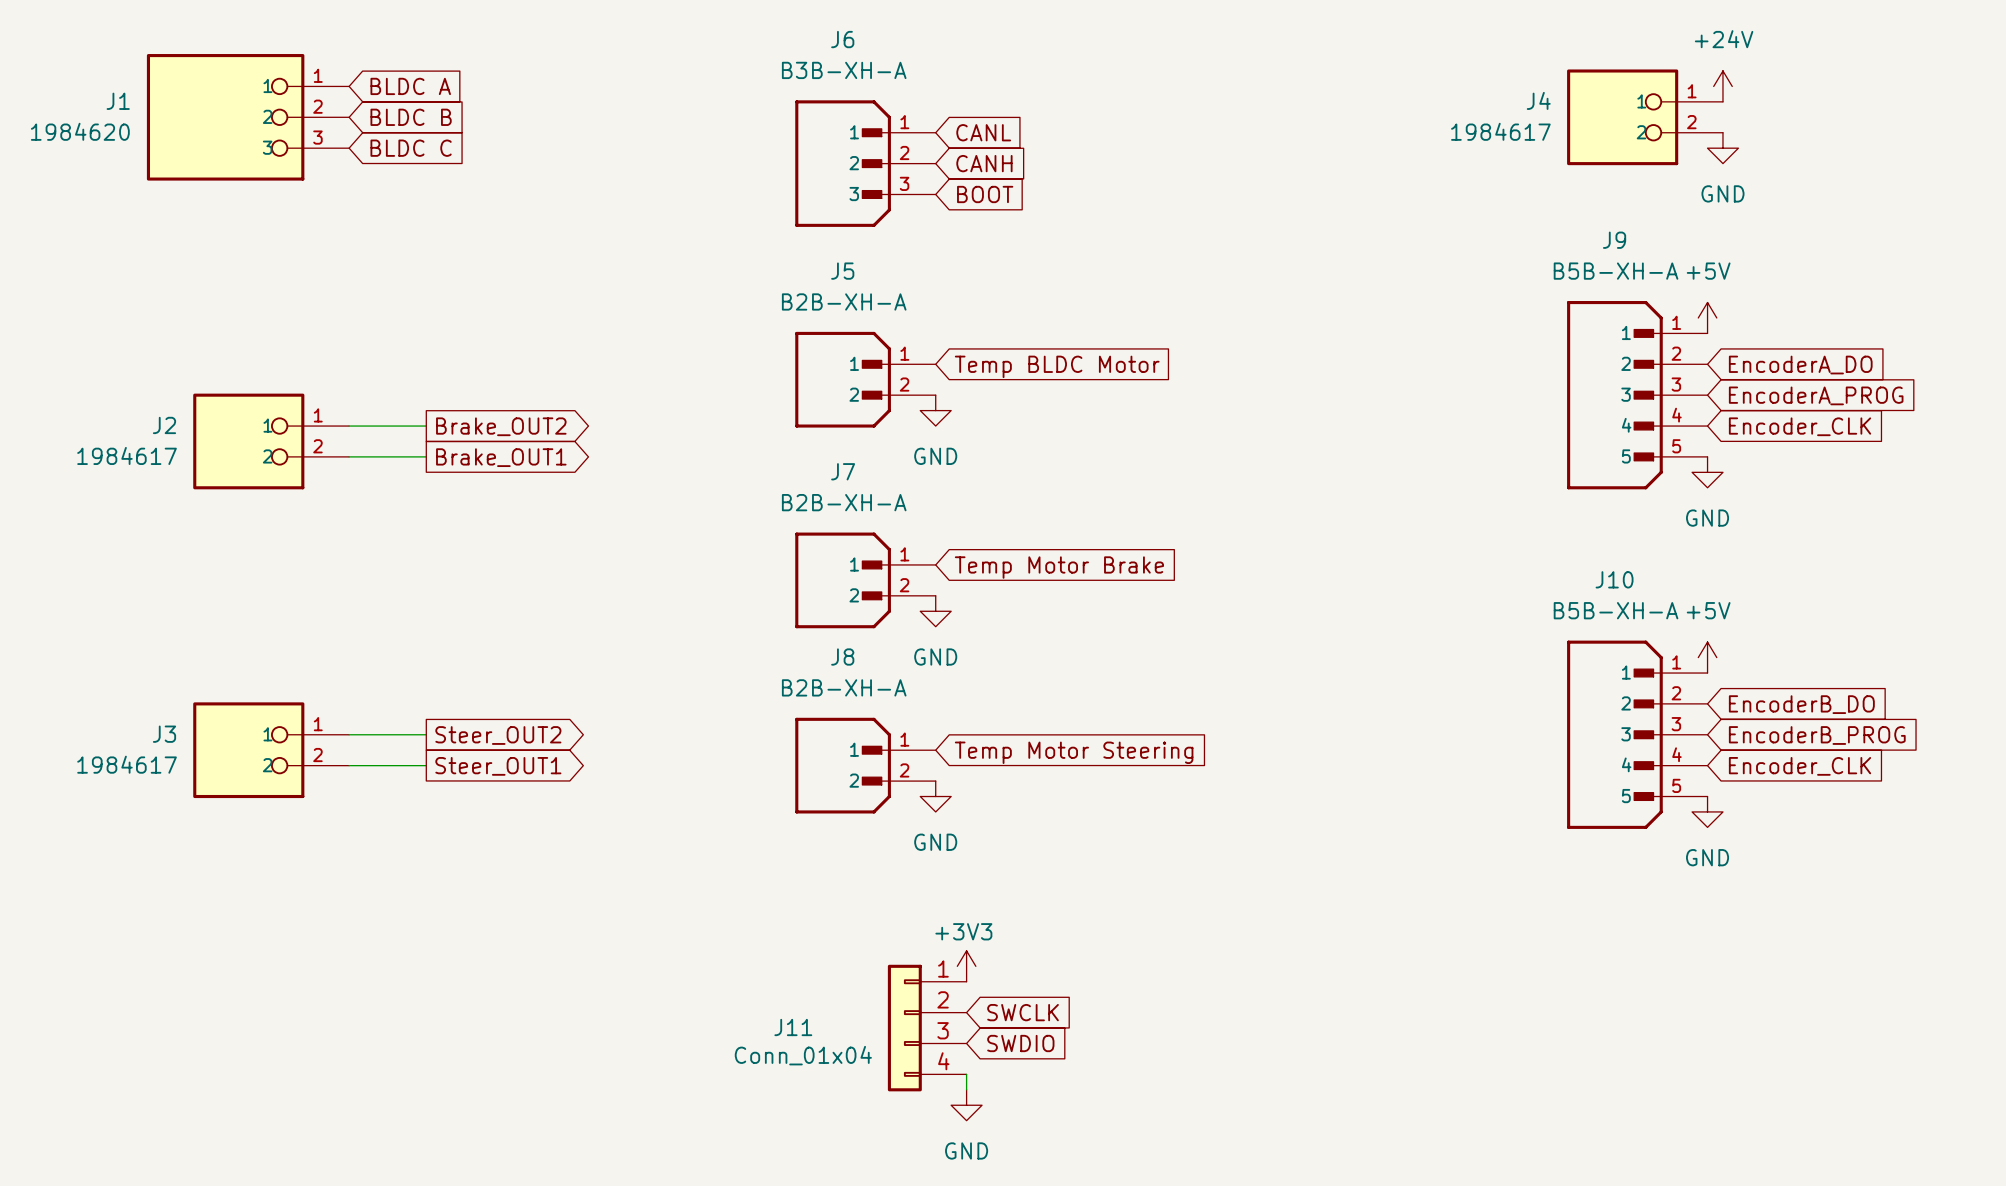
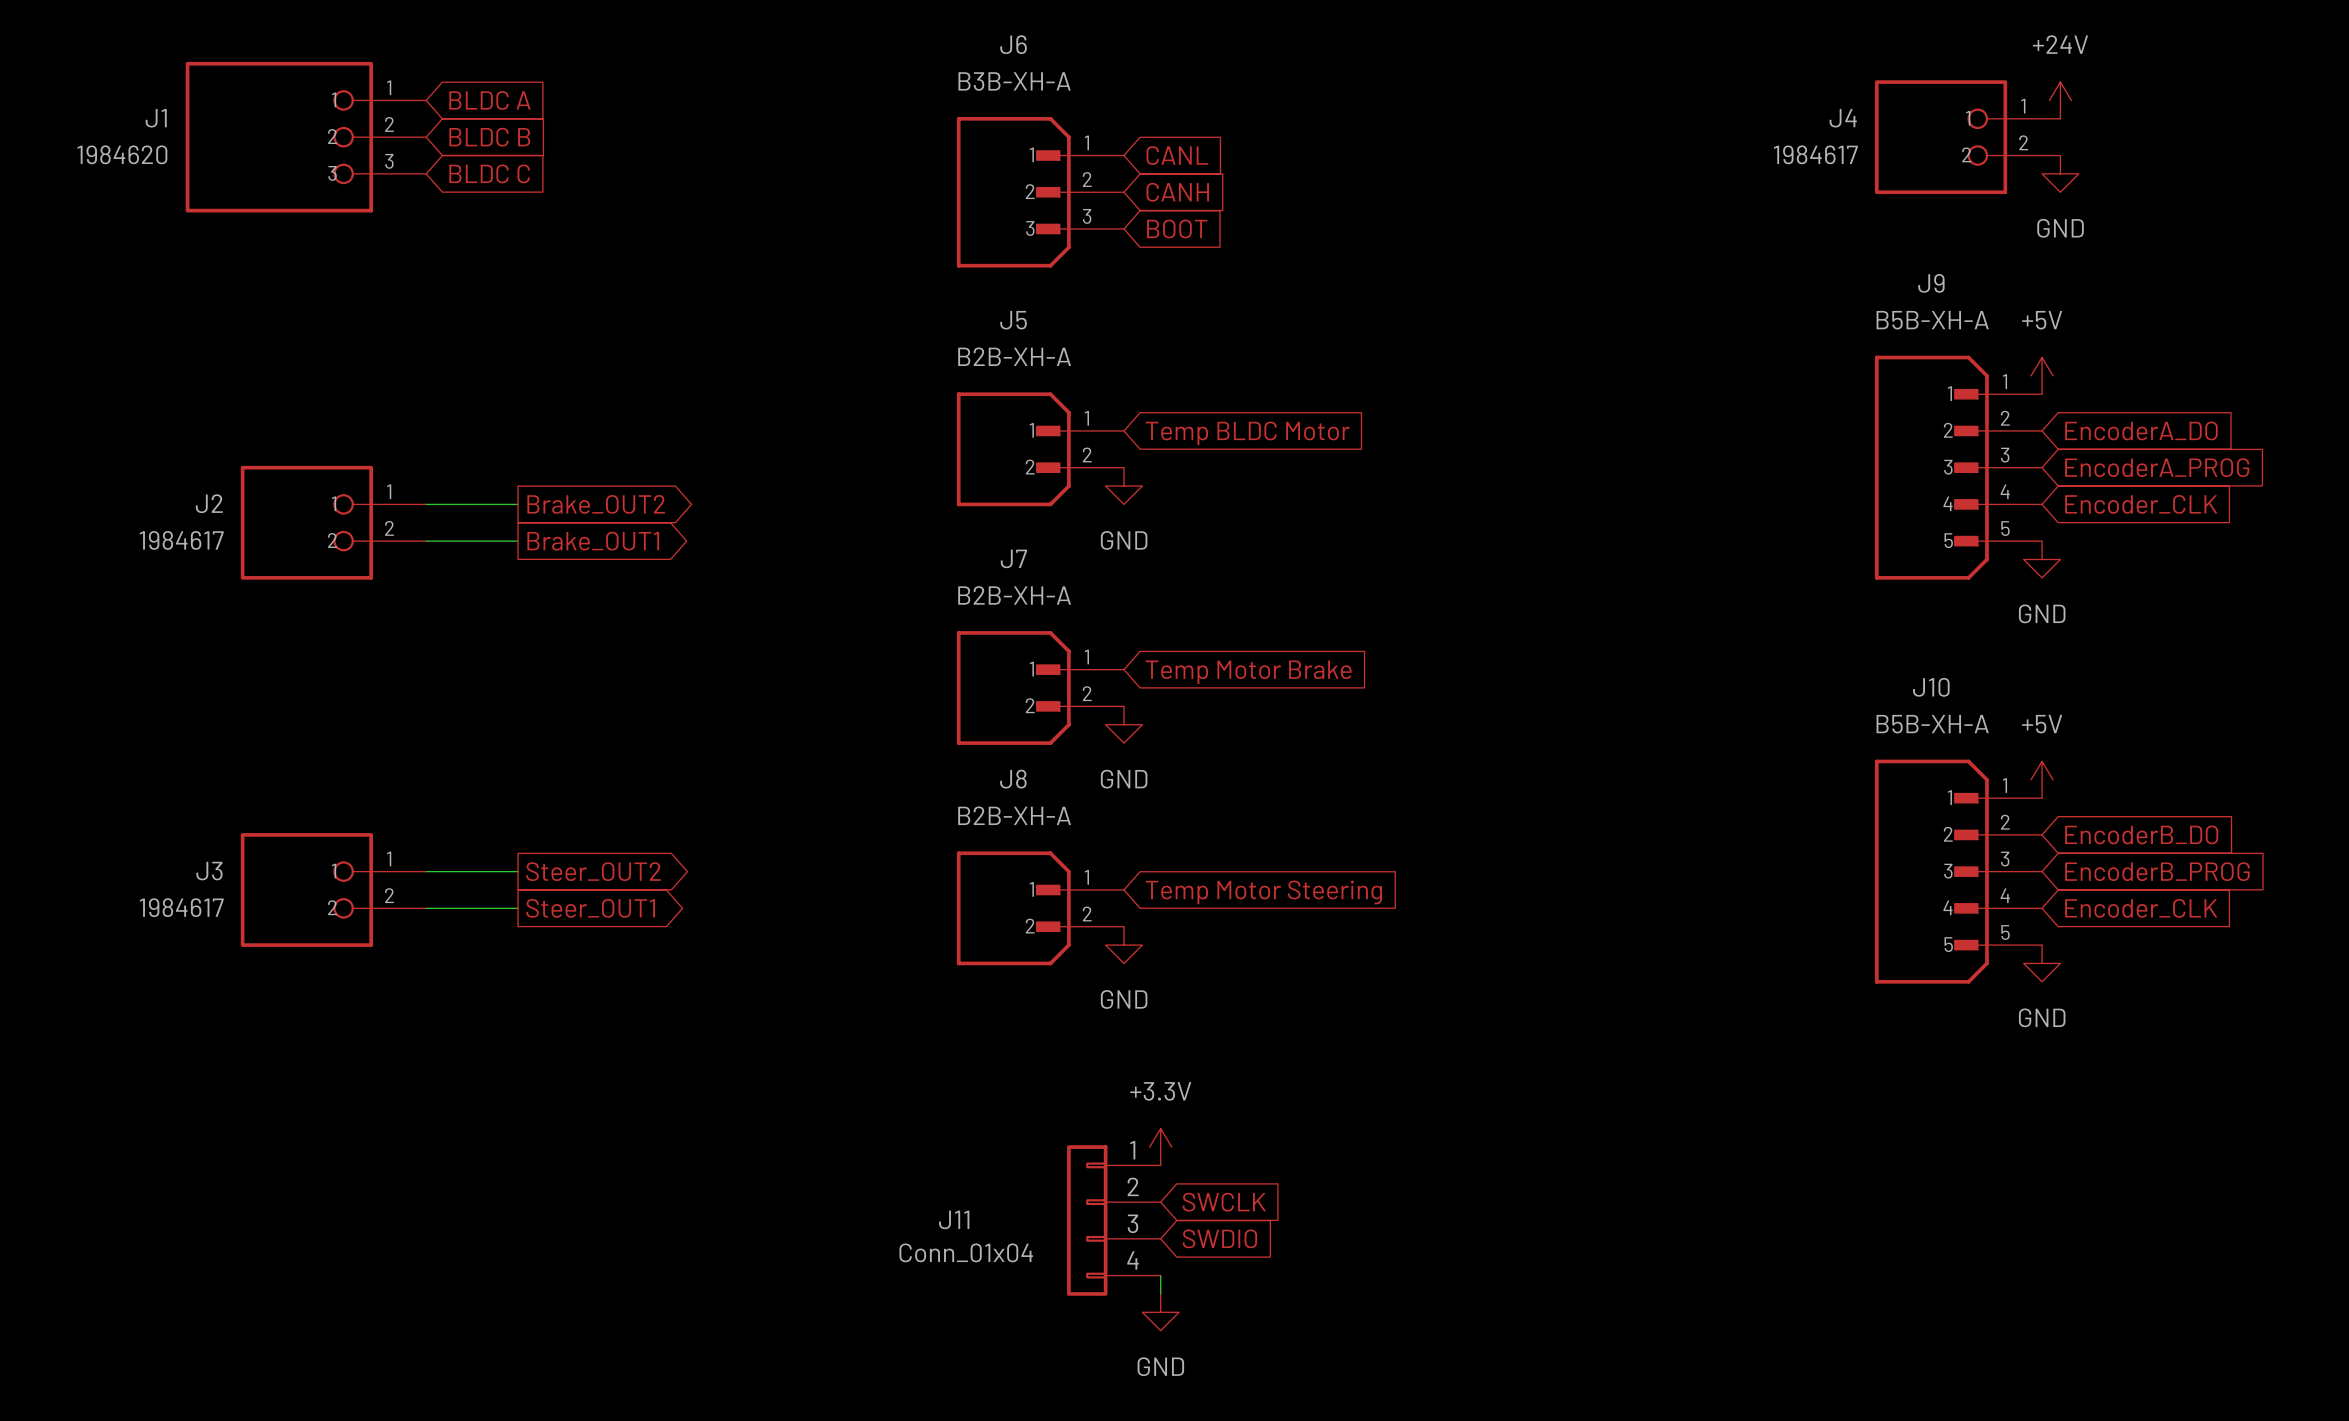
power symbol: +3V3 (966, 966) -> +3.3V (1160, 1147)

